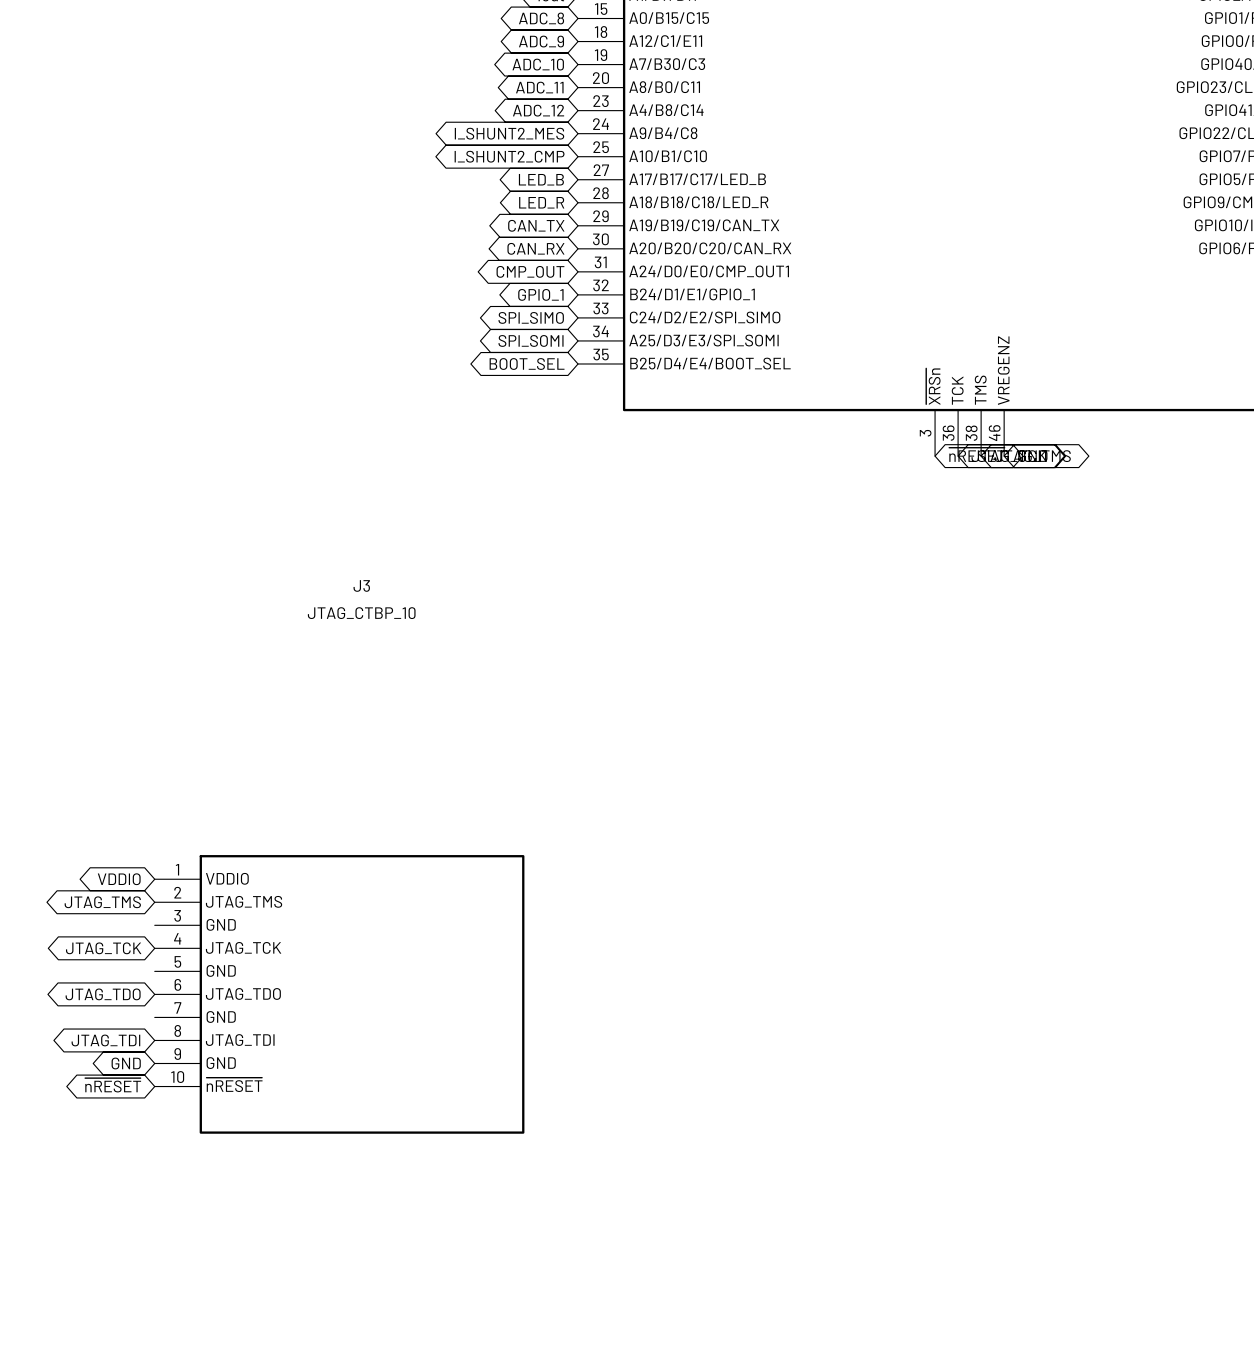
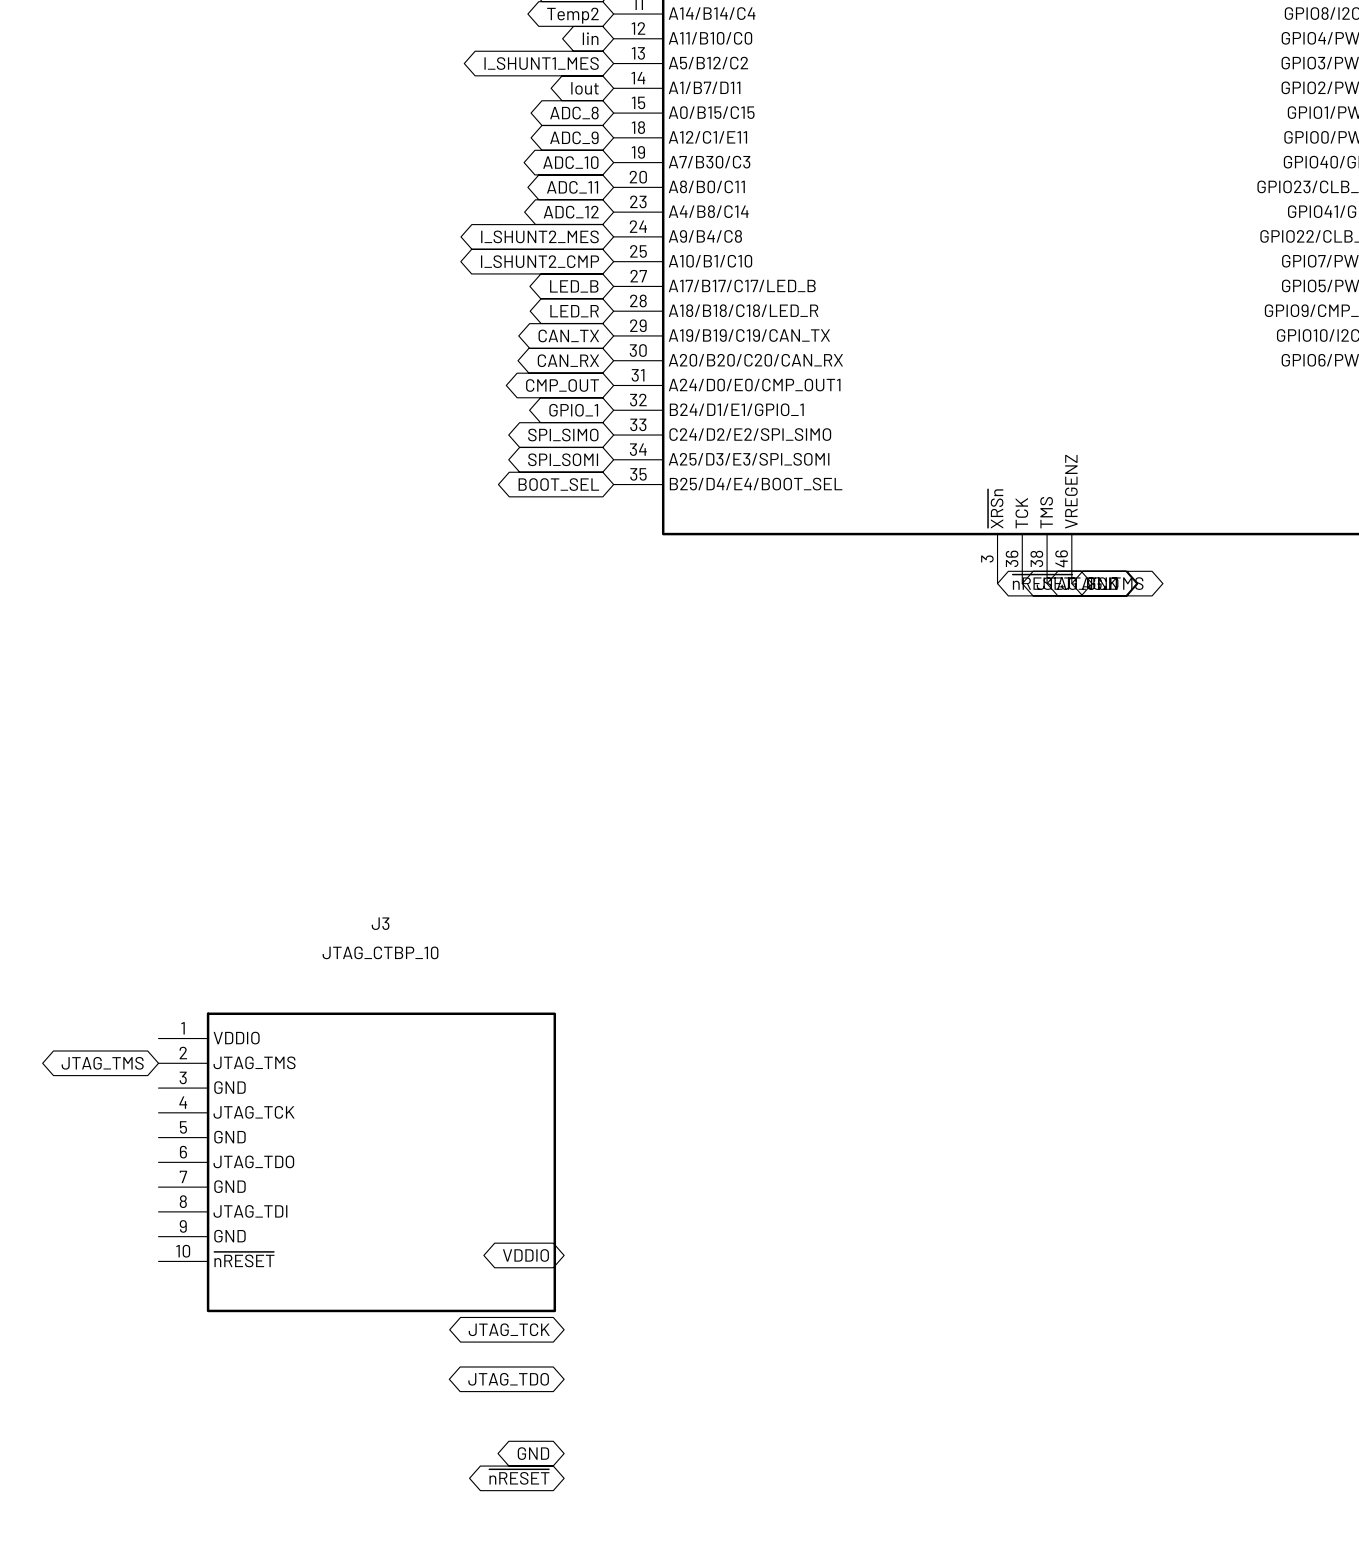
J3 name position: J3 (361, 585) -> J3 (380, 923)
J3 value position: JTAG_CTBP_10 (361, 613) -> JTAG_CTBP_10 (380, 952)
global label: VDDIO (119, 879) -> none
global label: JTAG_TCK (103, 948) -> none
global label: JTAG_TDO (103, 994) -> none
global label: JTAG_TDI (105, 1040) -> none
global label: GND (126, 1063) -> none
global label: none -> VDDIO (525, 1255)
global label: ~{nRESET} (113, 1085) -> none
global label: none -> JTAG_TCK (509, 1329)
global label: none -> JTAG_TDO (508, 1379)
global label: none -> GND (533, 1453)
global label: none -> ~{nRESET} (519, 1477)

